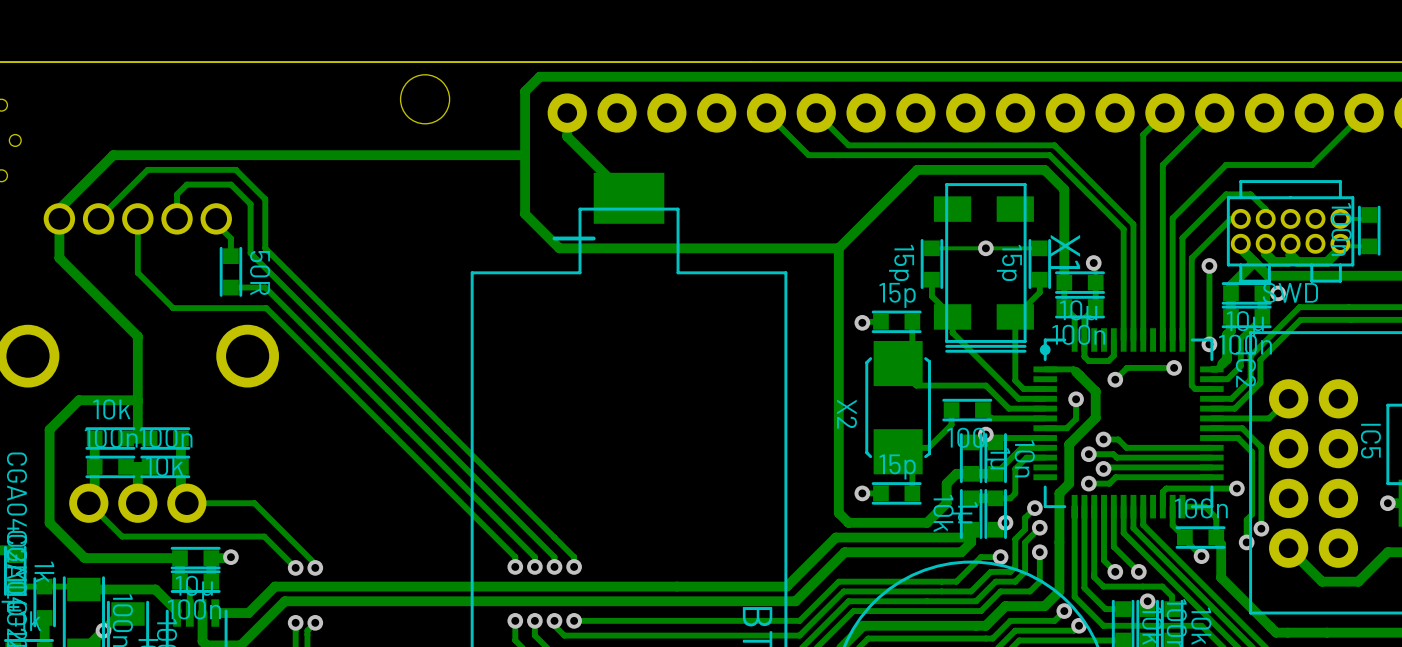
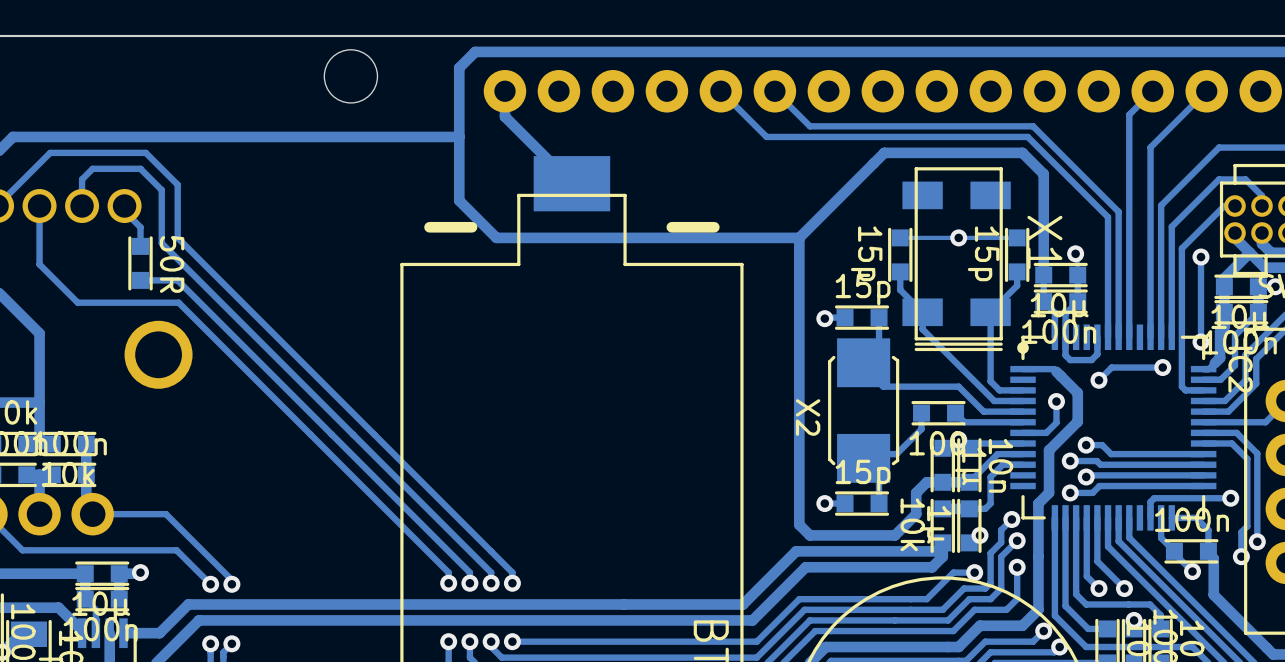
line: (593, 238) (554, 238) -> (472, 227) (429, 227)
line: none -> (714, 227) (671, 227)

